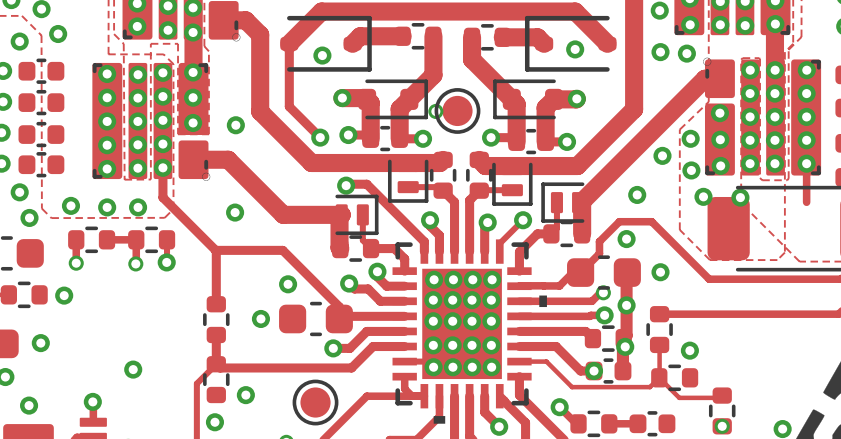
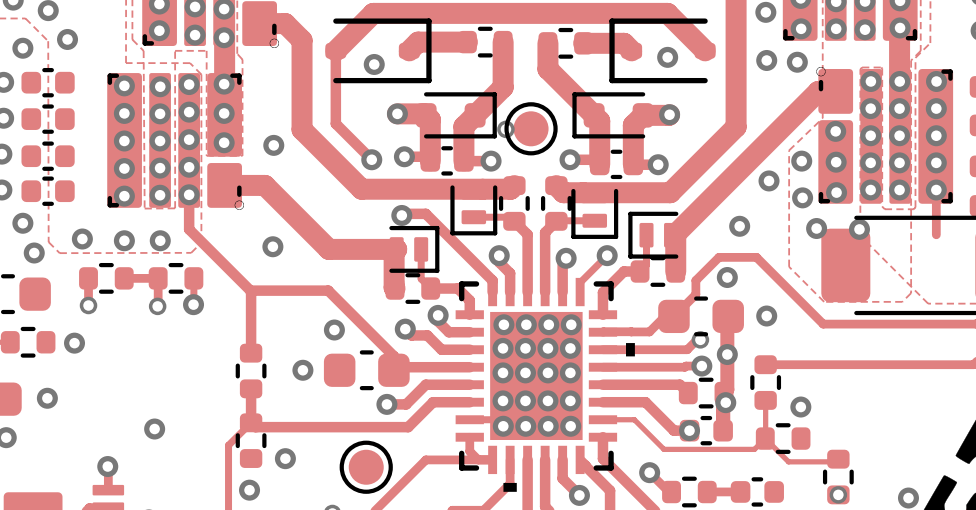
via: (29, 405) -> none

